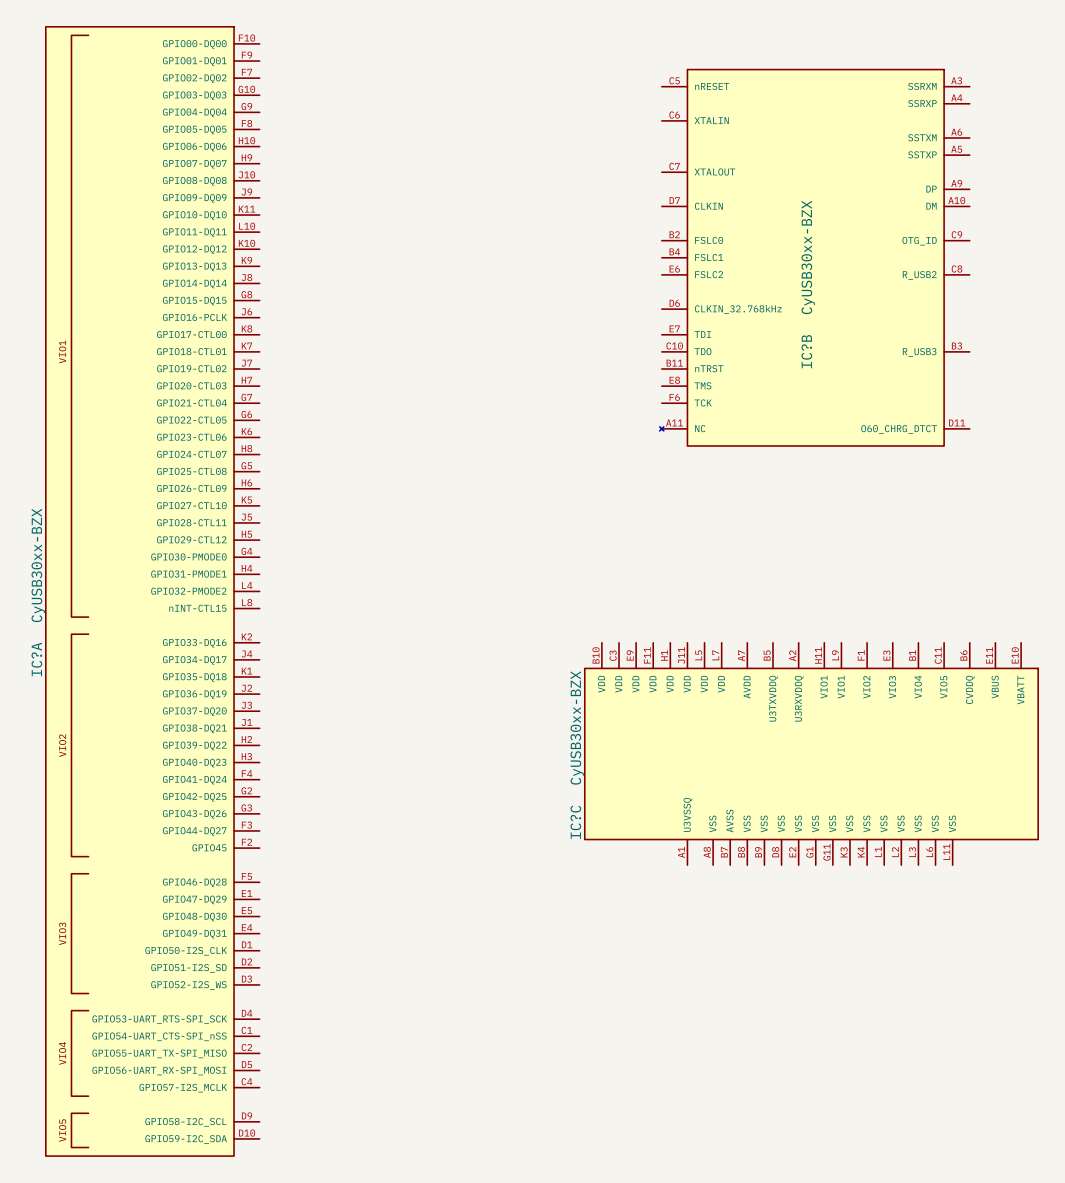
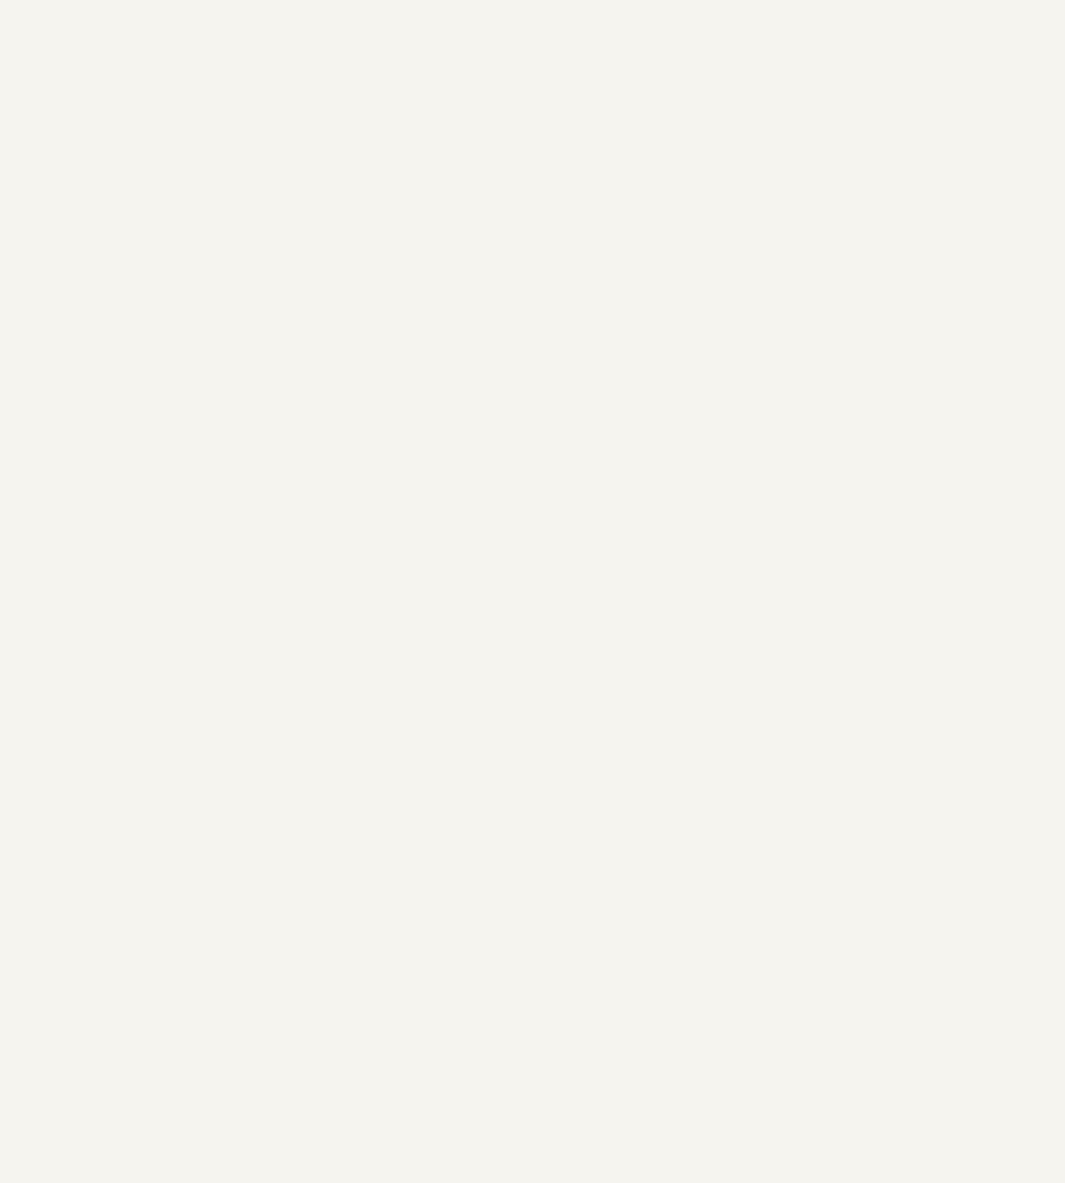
IC?B: CyUSB30xx-BZX (814, 257) -> none
IC?A: CyUSB30xx-BZX (152, 591) -> none
IC?C: CyUSB30xx-BZX (811, 753) -> none

